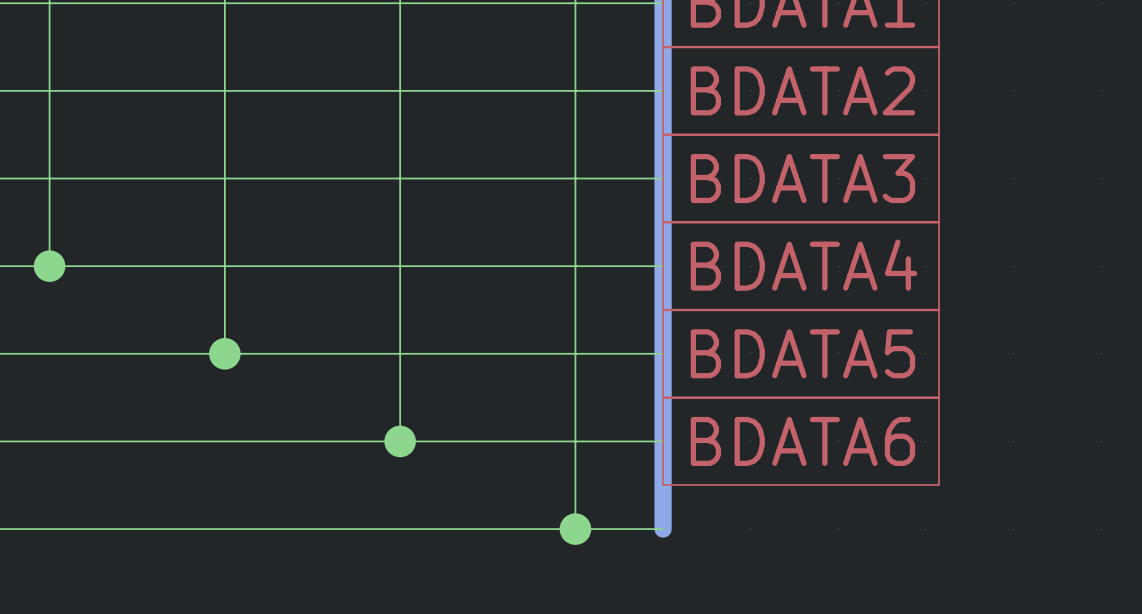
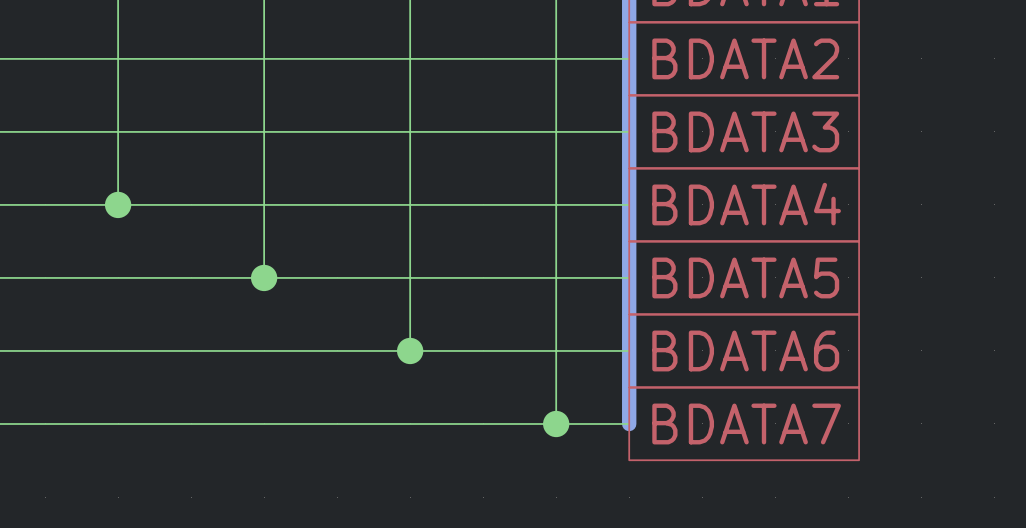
global label: none -> BDATA7 (746, 423)

